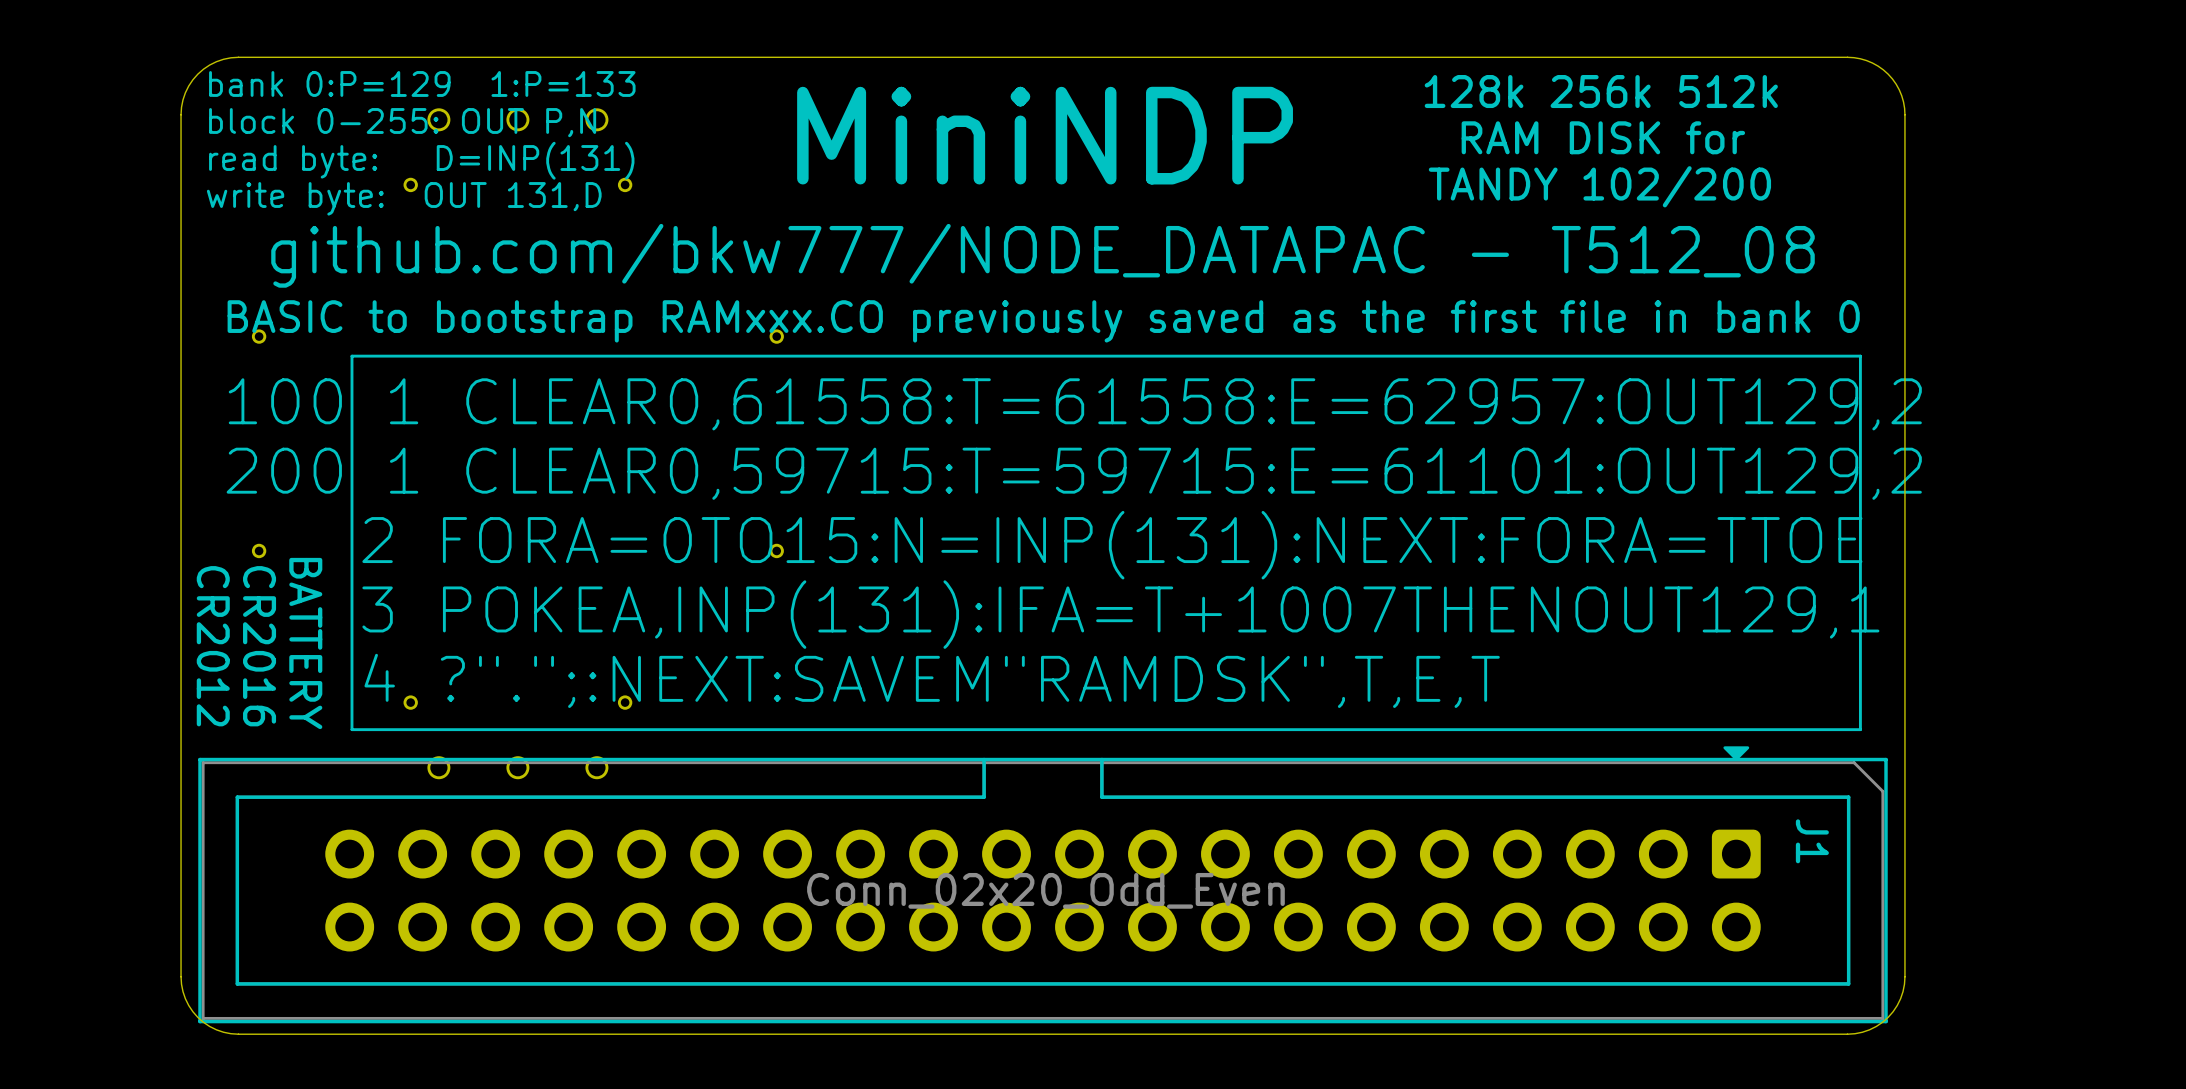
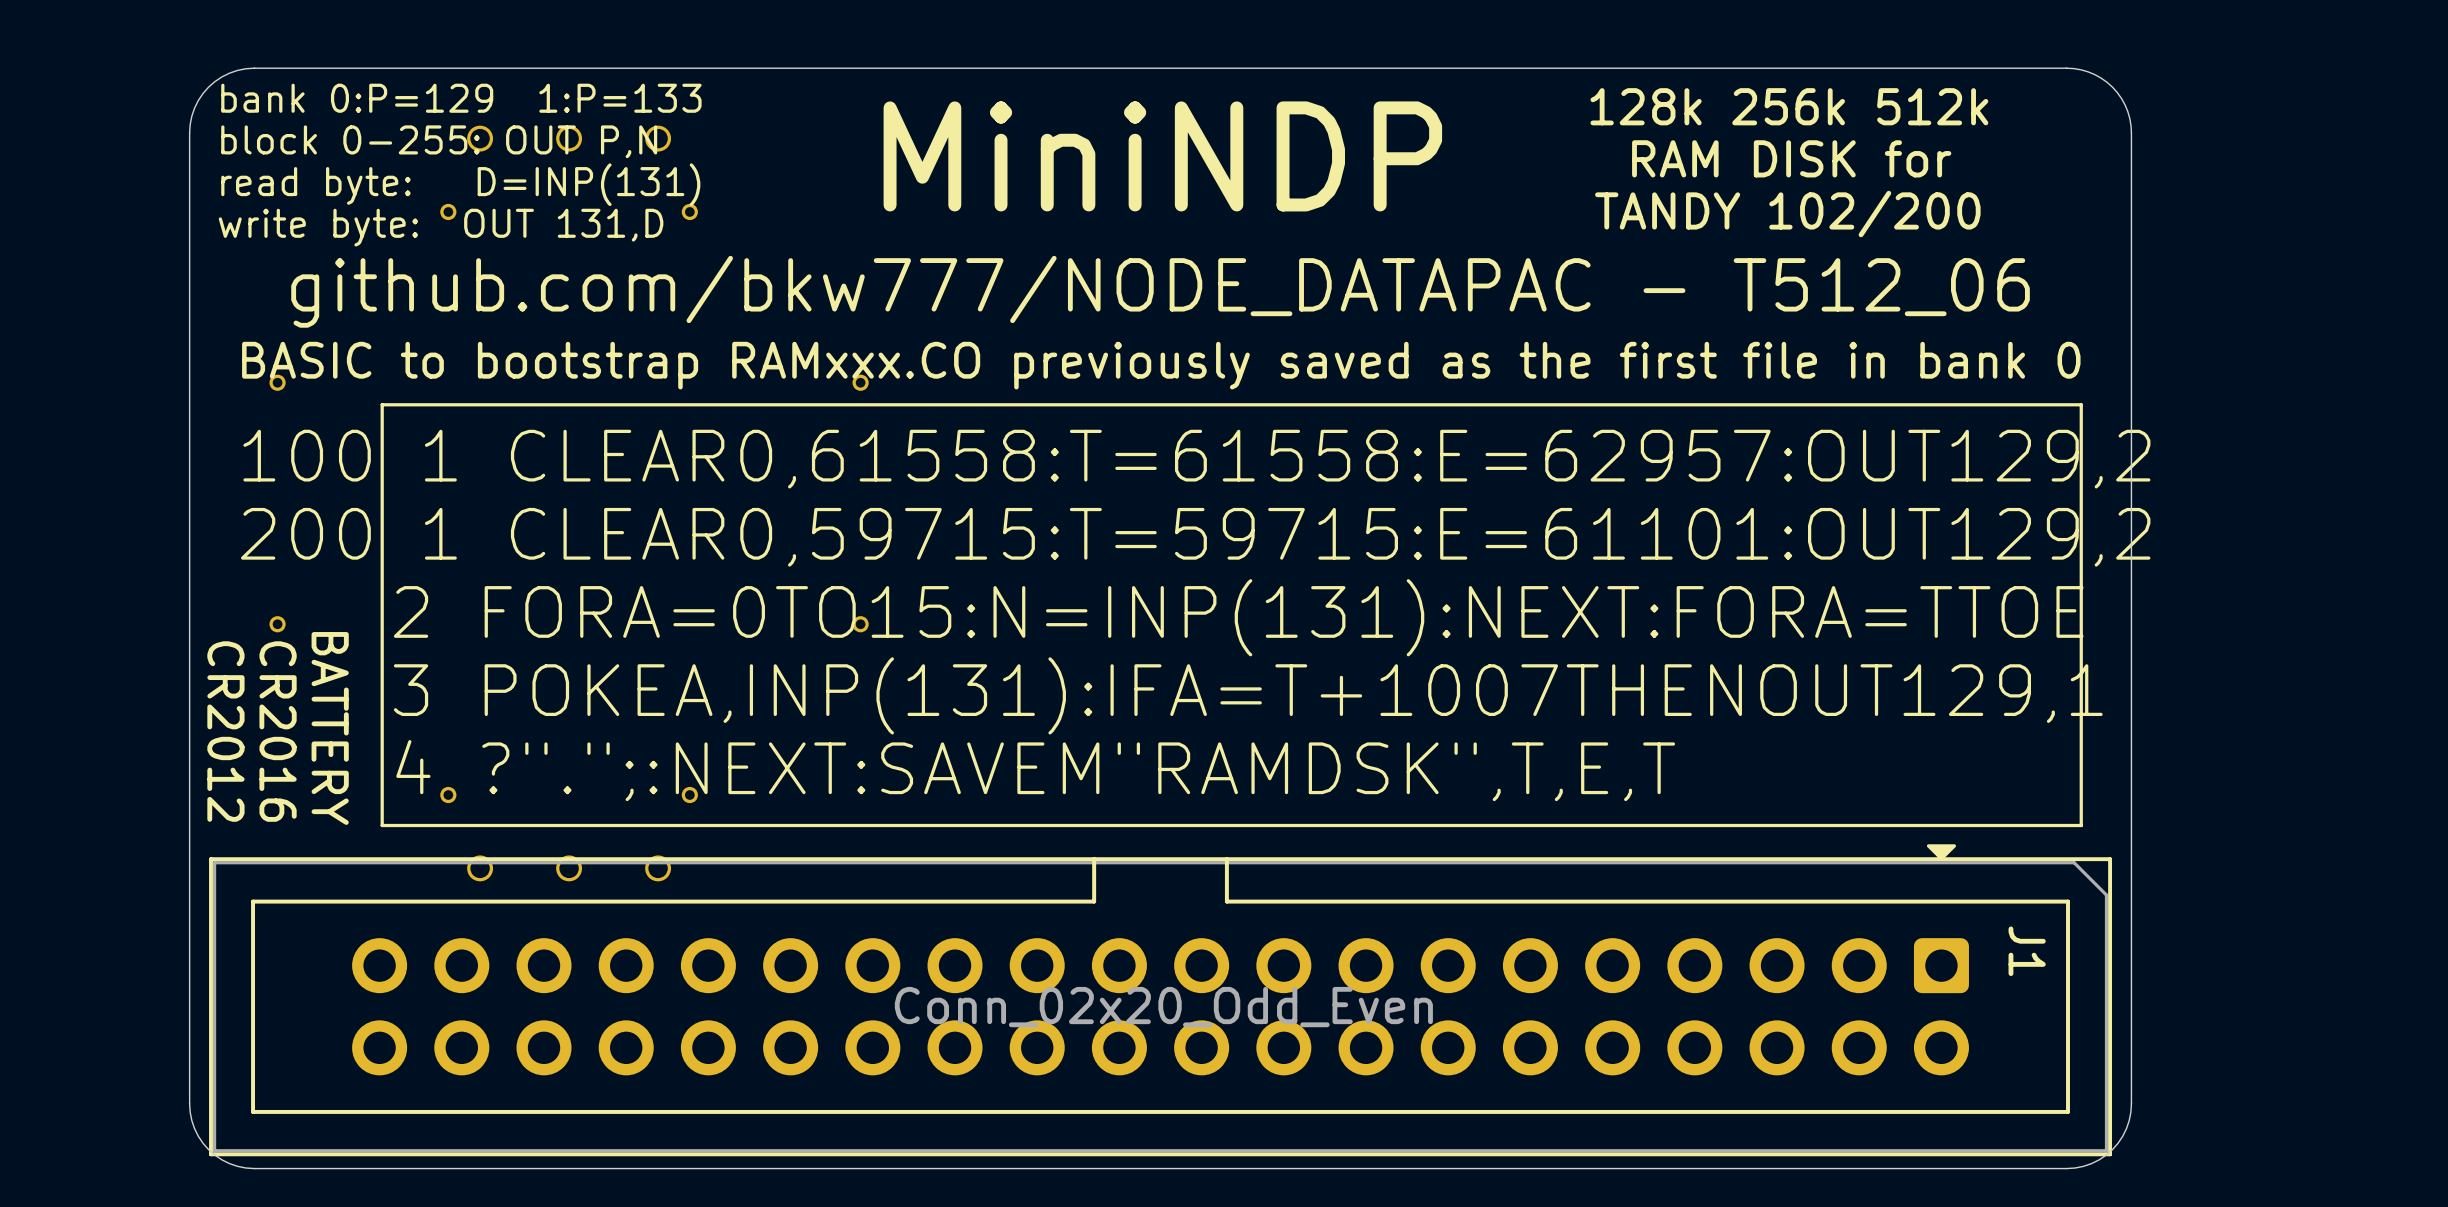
text: github.com/bkw777/NODE_DATAPAC - T512_08 (1043, 255) -> github.com/bkw777/NODE_DATAPAC - T512_06 (1160, 291)

